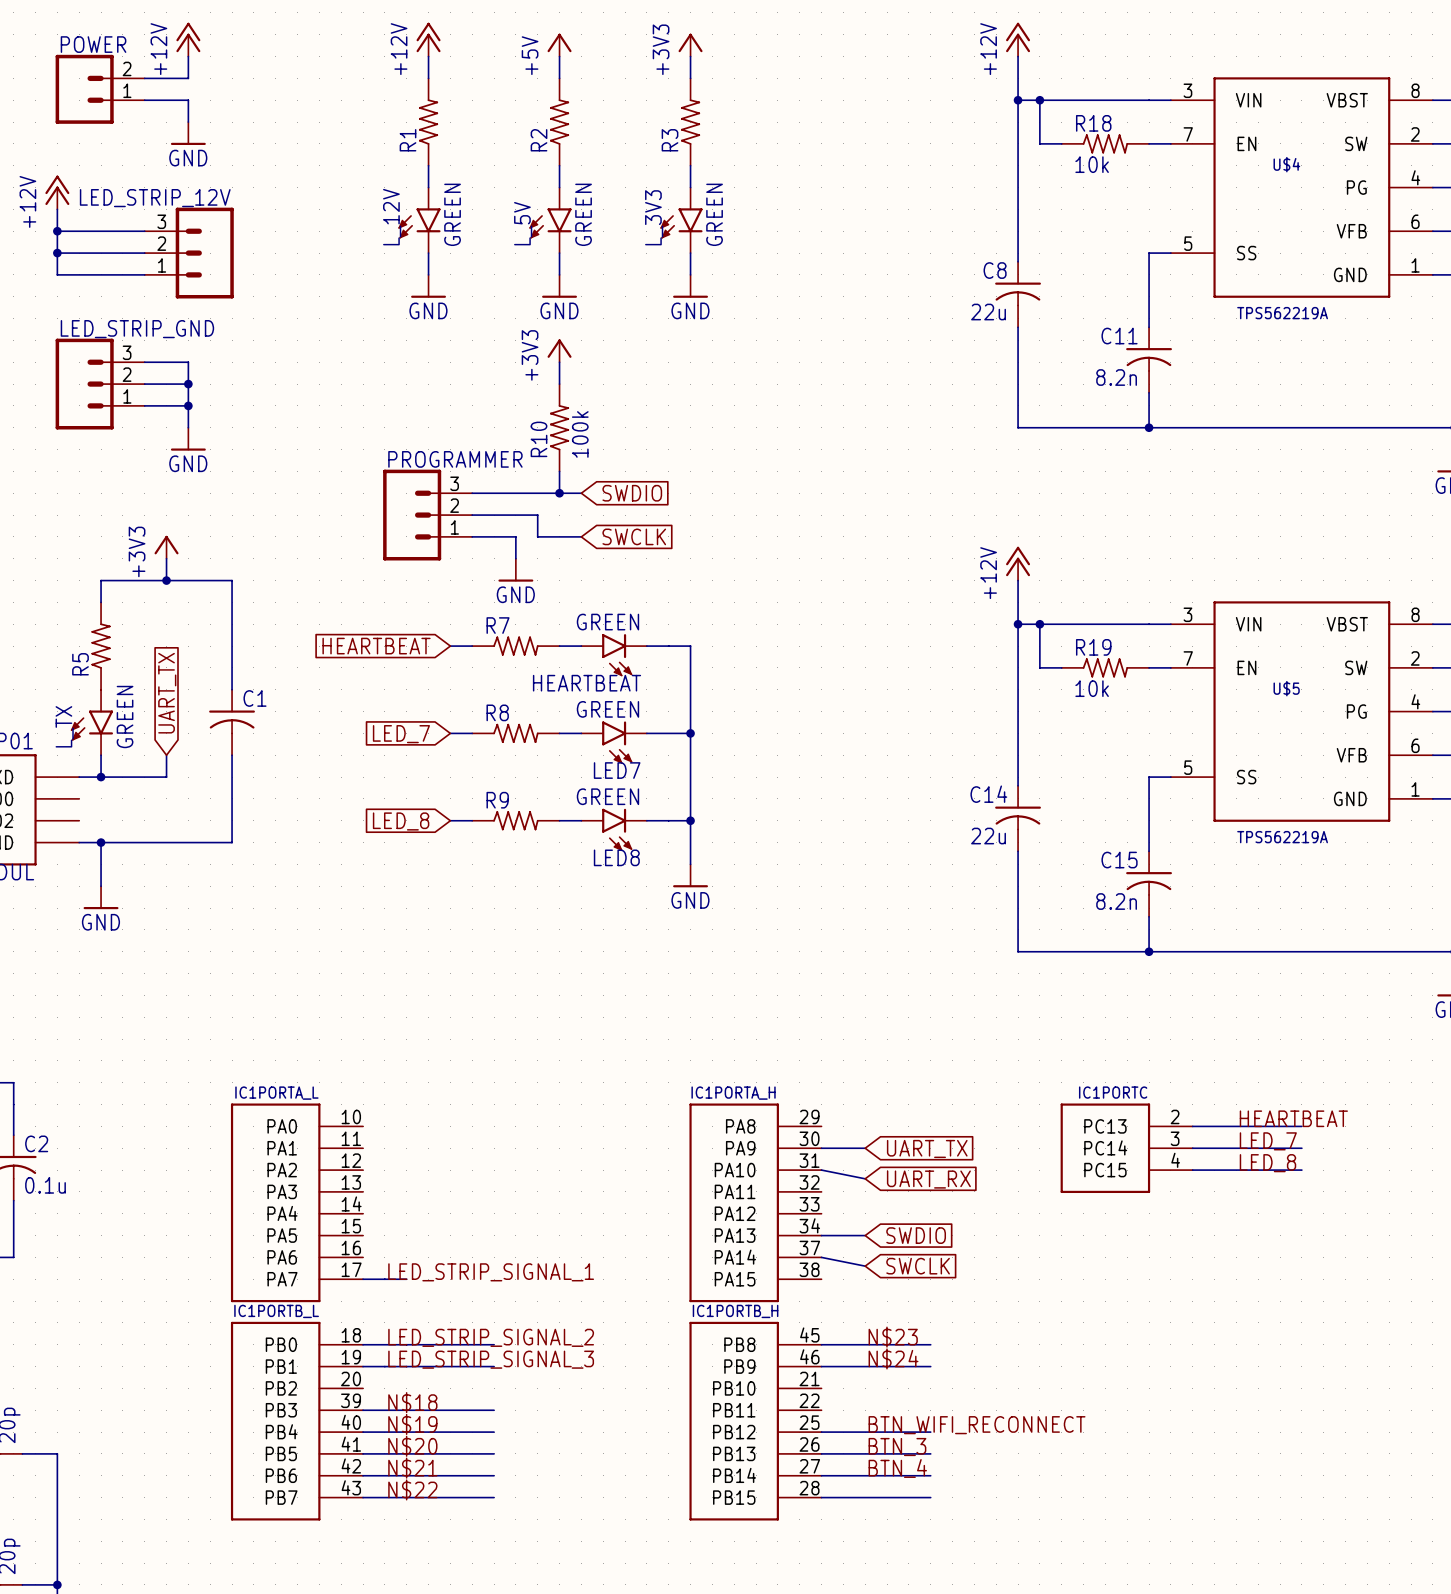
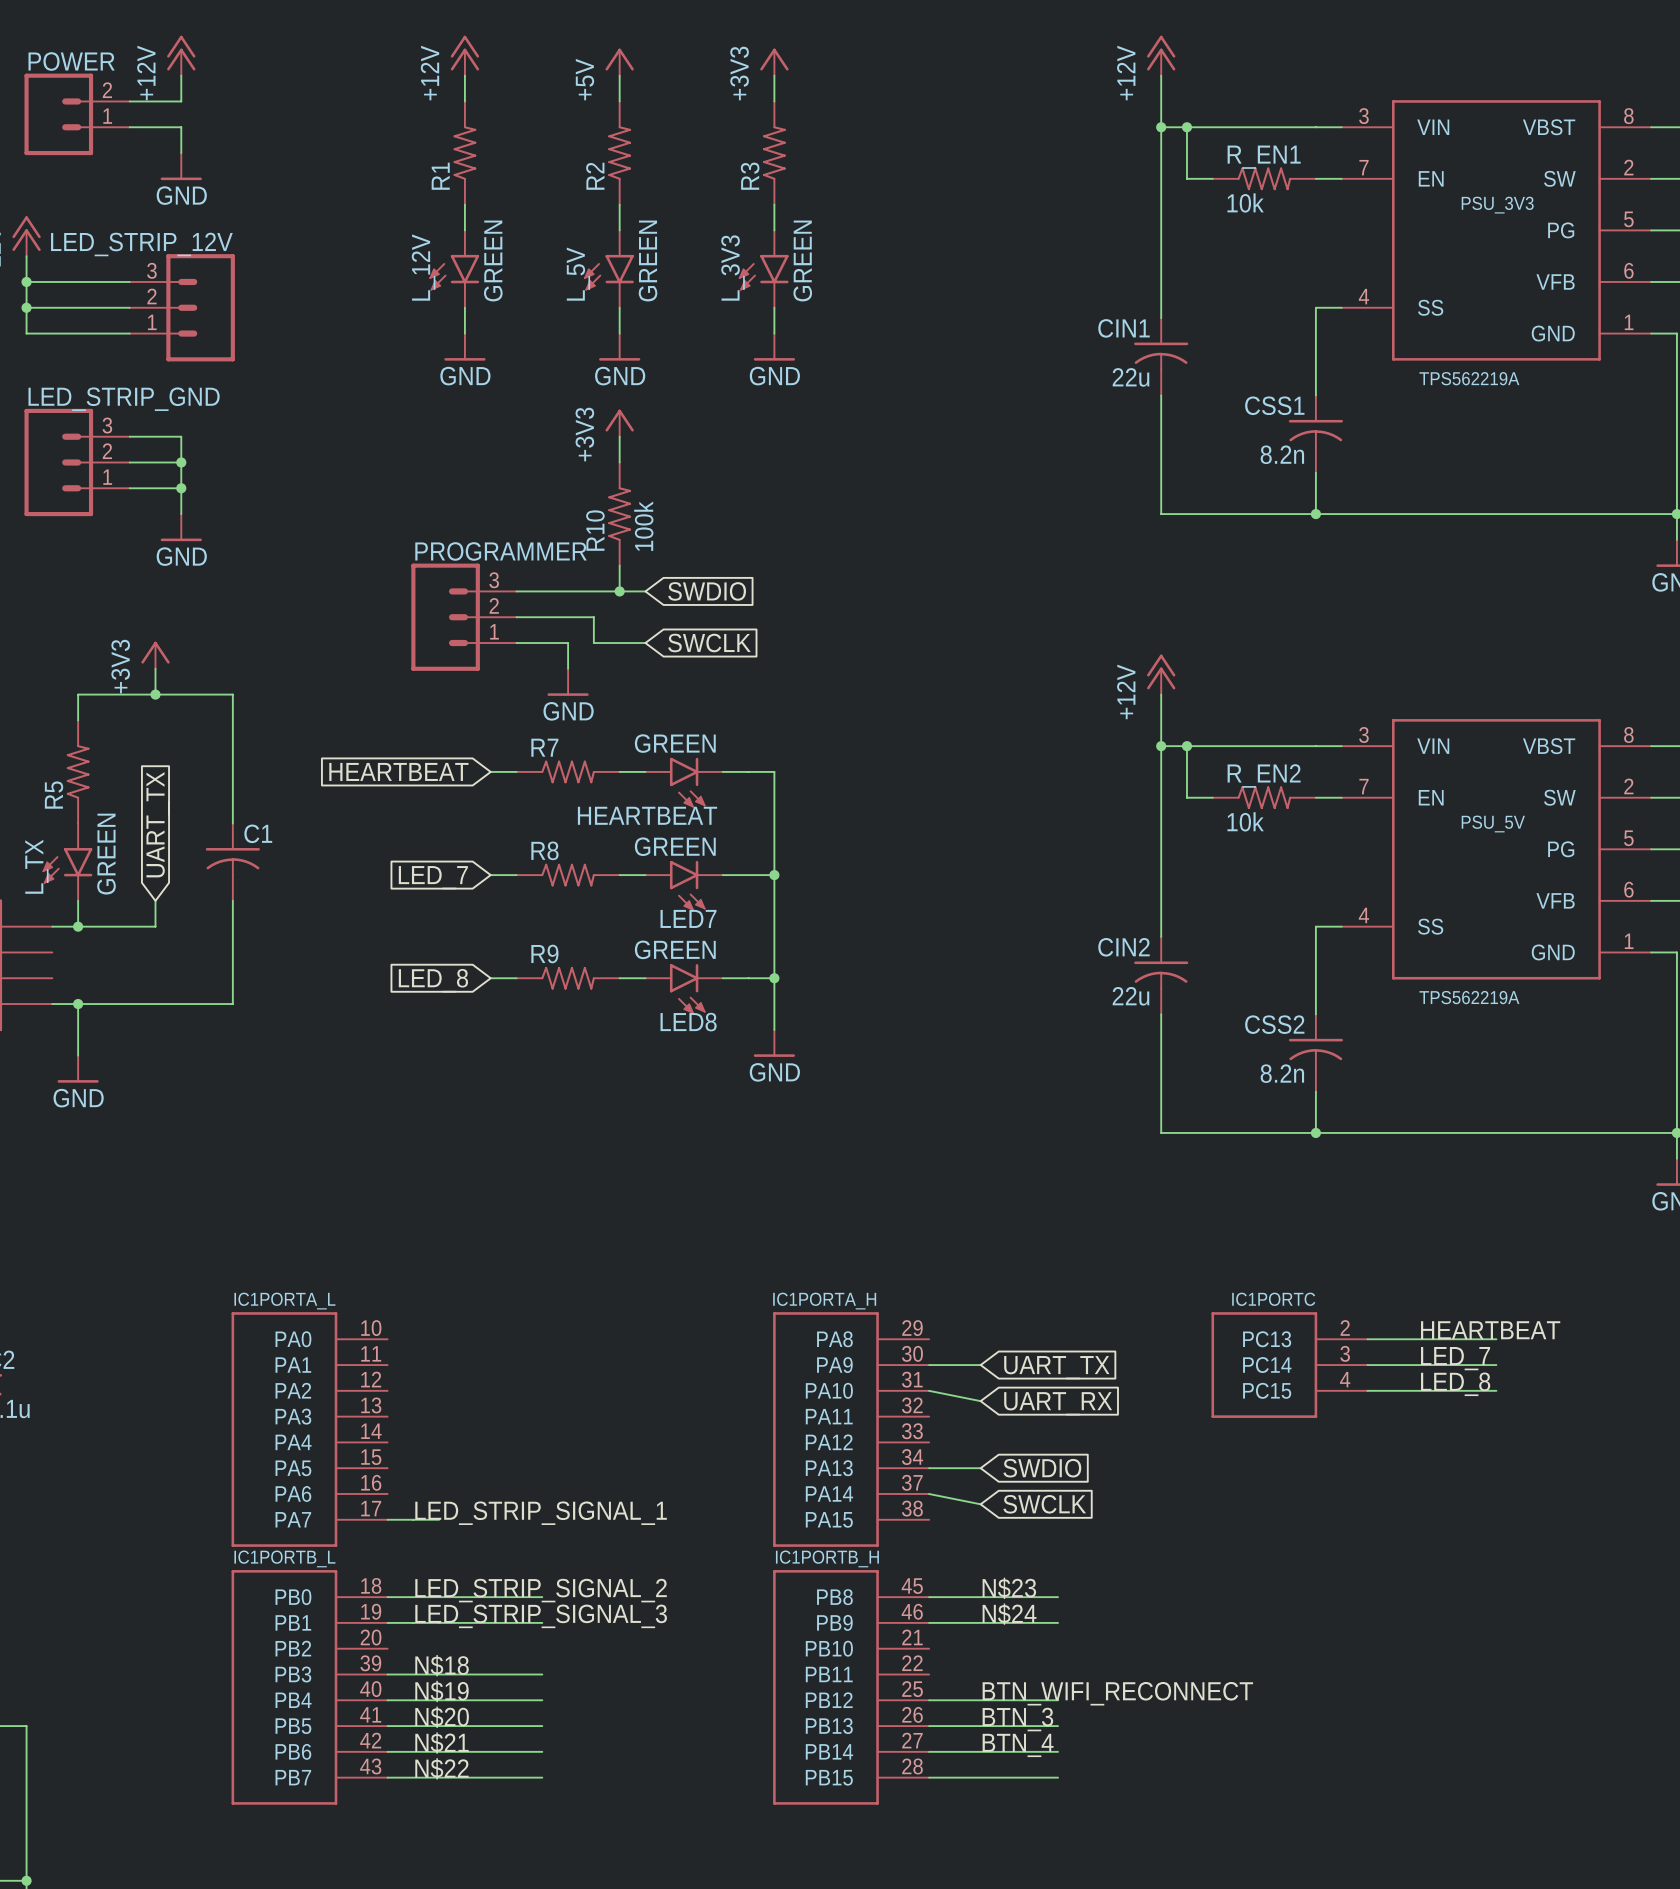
R18 name: R18 (1093, 123) -> R_EN1 (1264, 157)
U$4 name: U$4 (1286, 164) -> PSU_3V3 (1497, 205)
U$4 pin number: 4 (1415, 177) -> 5 (1628, 219)
U$4 pin number: 5 (1188, 243) -> 4 (1363, 296)
C8 name: C8 (995, 270) -> CIN1 (1124, 328)
C11 name: C11 (1119, 336) -> CSS1 (1274, 405)
R19 name: R19 (1093, 647) -> R_EN2 (1264, 775)
U$5 name: U$5 (1286, 688) -> PSU_5V (1493, 823)
U$5 pin number: 4 (1415, 701) -> 5 (1628, 838)
U$5 pin number: 5 (1188, 767) -> 4 (1363, 915)
C14 name: C14 (988, 794) -> CIN2 (1123, 947)
C15 name: C15 (1119, 860) -> CSS2 (1274, 1024)

